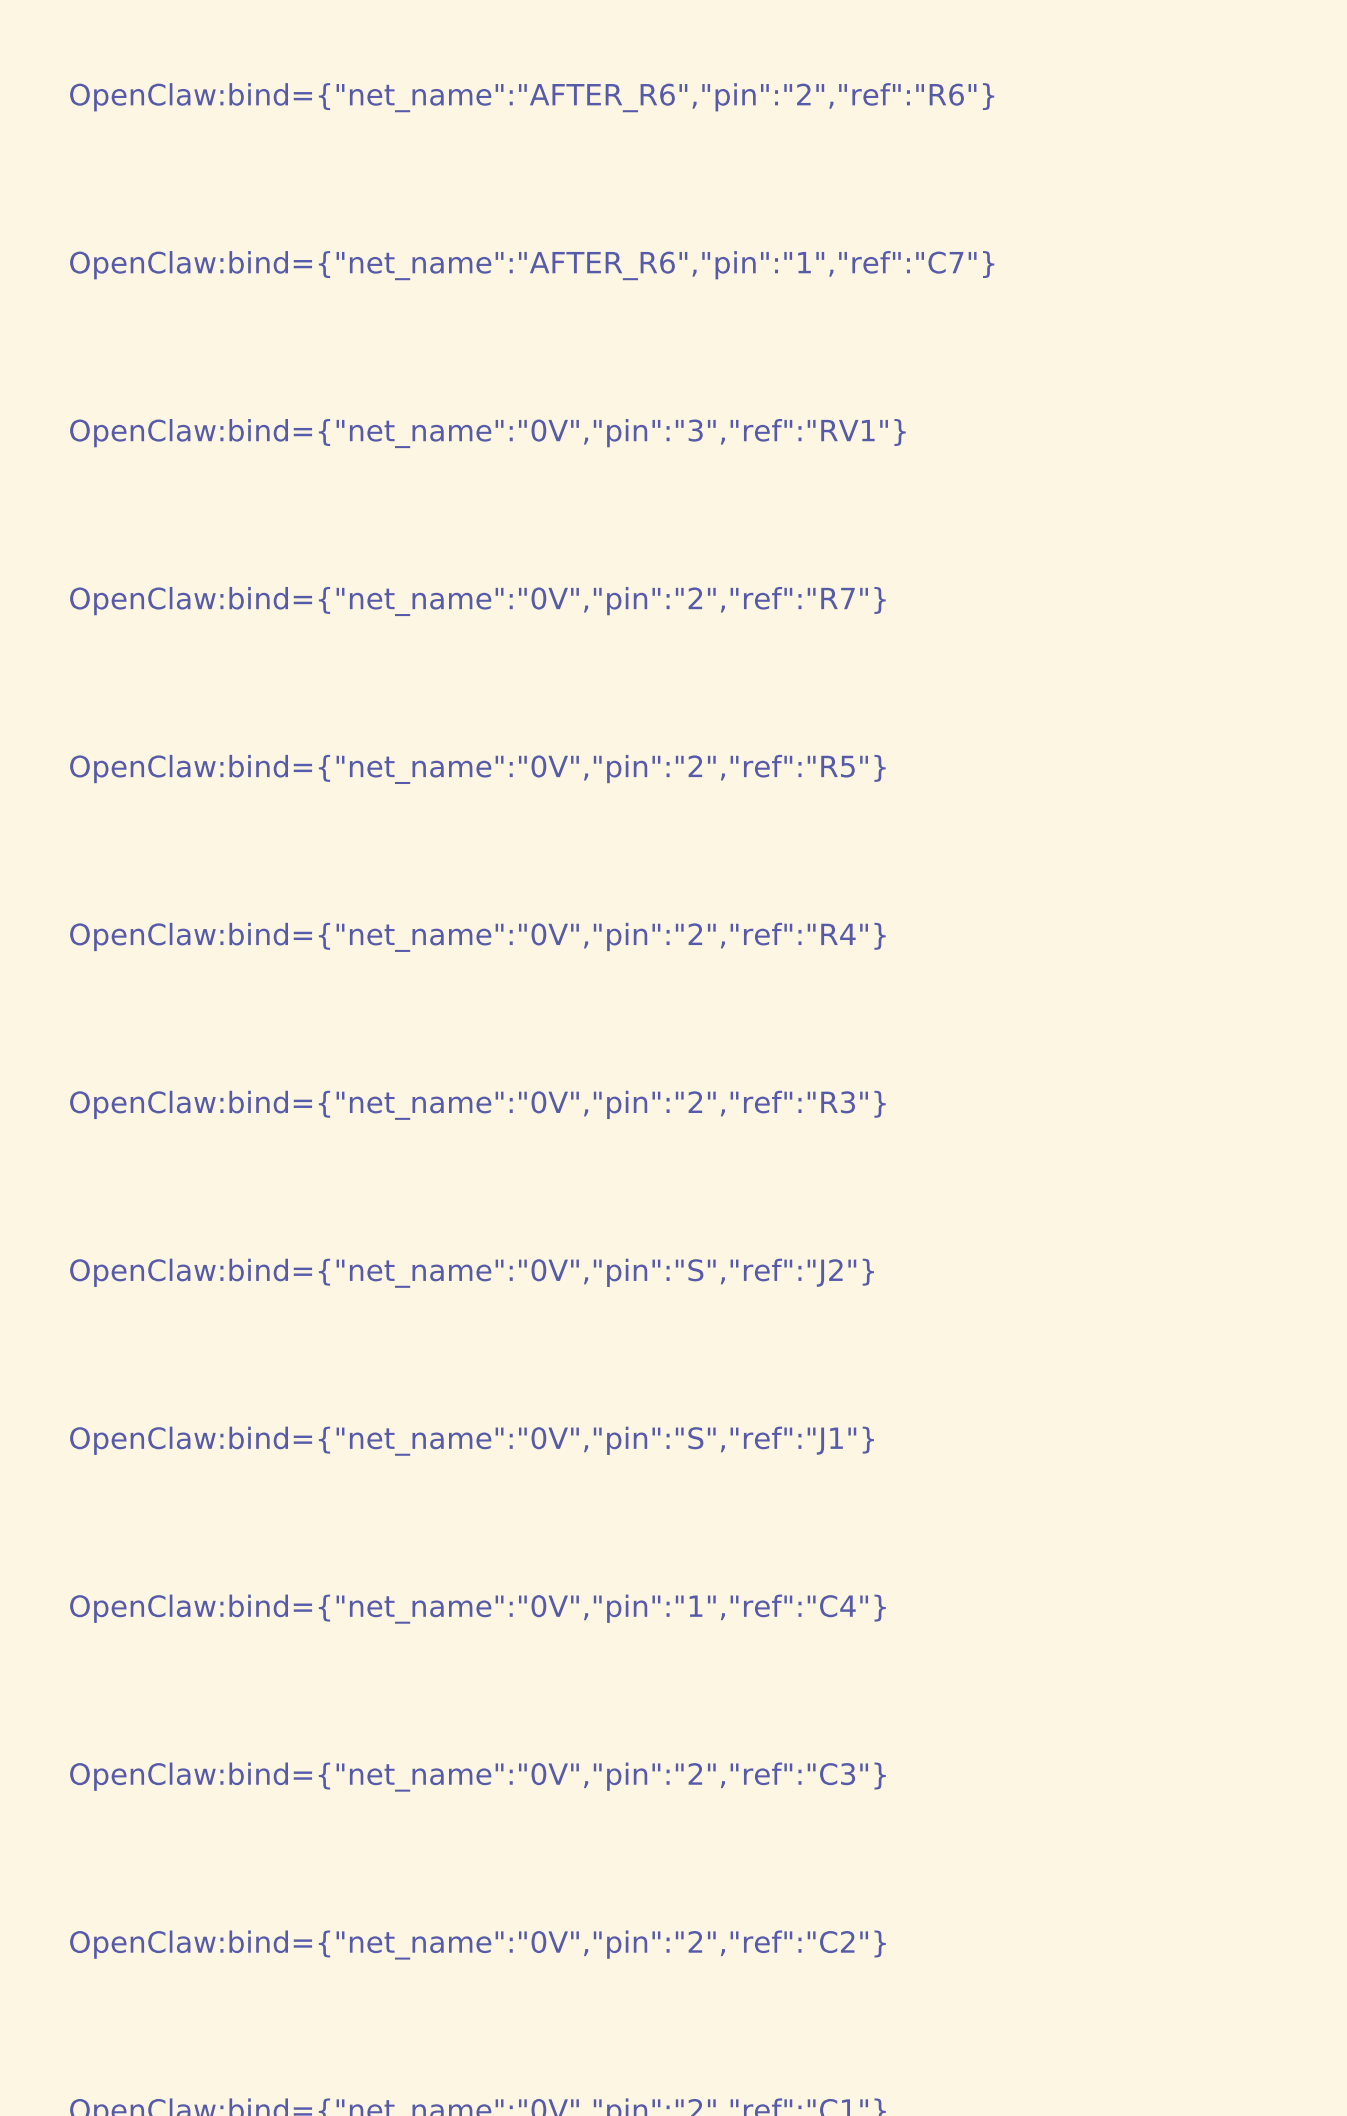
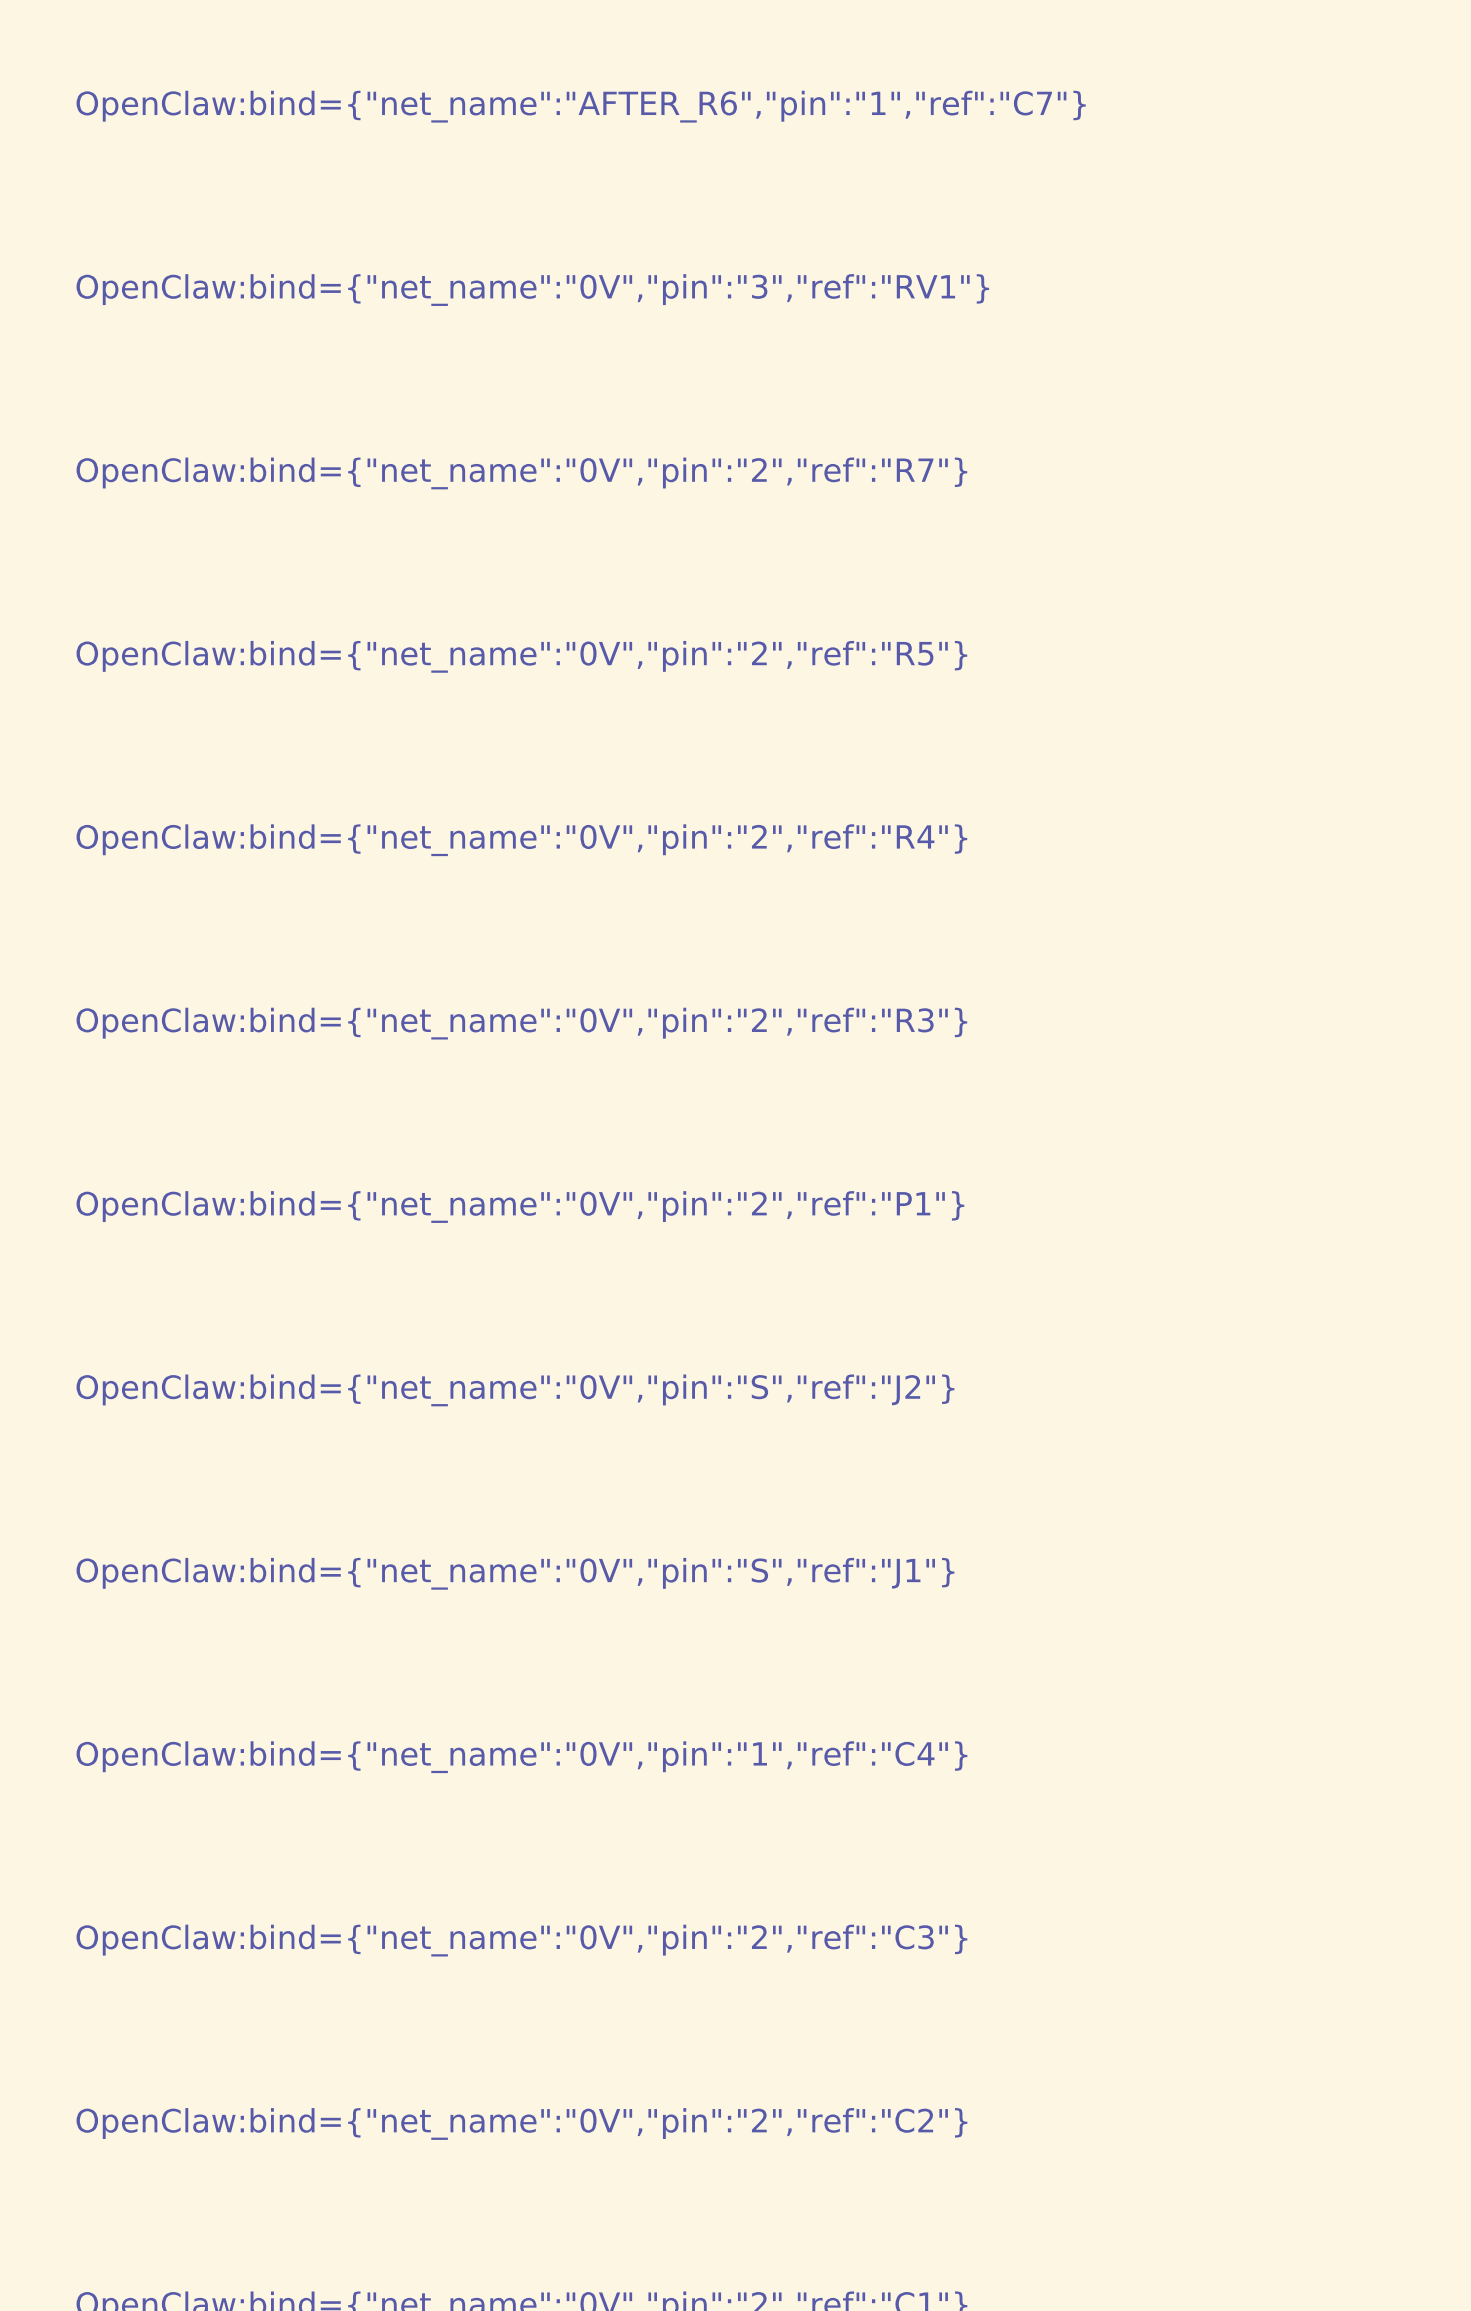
text: OpenClaw:bind={"net_name":"AFTER_R6","pin":"2","ref":"R6"} (532, 97) -> OpenClaw:bind={"net_name":"AFTER_R6","pin":"1","ref":"C7"} (581, 106)
text: OpenClaw:bind={"net_name":"AFTER_R6","pin":"1","ref":"C7"} (532, 265) -> OpenClaw:bind={"net_name":"0V","pin":"3","ref":"RV1"} (532, 290)
text: OpenClaw:bind={"net_name":"0V","pin":"3","ref":"RV1"} (487, 433) -> OpenClaw:bind={"net_name":"0V","pin":"2","ref":"R7"} (521, 473)
text: OpenClaw:bind={"net_name":"0V","pin":"2","ref":"R7"} (477, 601) -> OpenClaw:bind={"net_name":"0V","pin":"2","ref":"R5"} (521, 656)
text: OpenClaw:bind={"net_name":"0V","pin":"2","ref":"R5"} (477, 769) -> OpenClaw:bind={"net_name":"0V","pin":"2","ref":"R4"} (521, 840)
text: OpenClaw:bind={"net_name":"0V","pin":"2","ref":"R4"} (477, 937) -> OpenClaw:bind={"net_name":"0V","pin":"2","ref":"R3"} (521, 1023)
text: OpenClaw:bind={"net_name":"0V","pin":"2","ref":"R3"} (477, 1105) -> OpenClaw:bind={"net_name":"0V","pin":"2","ref":"P1"} (520, 1207)

